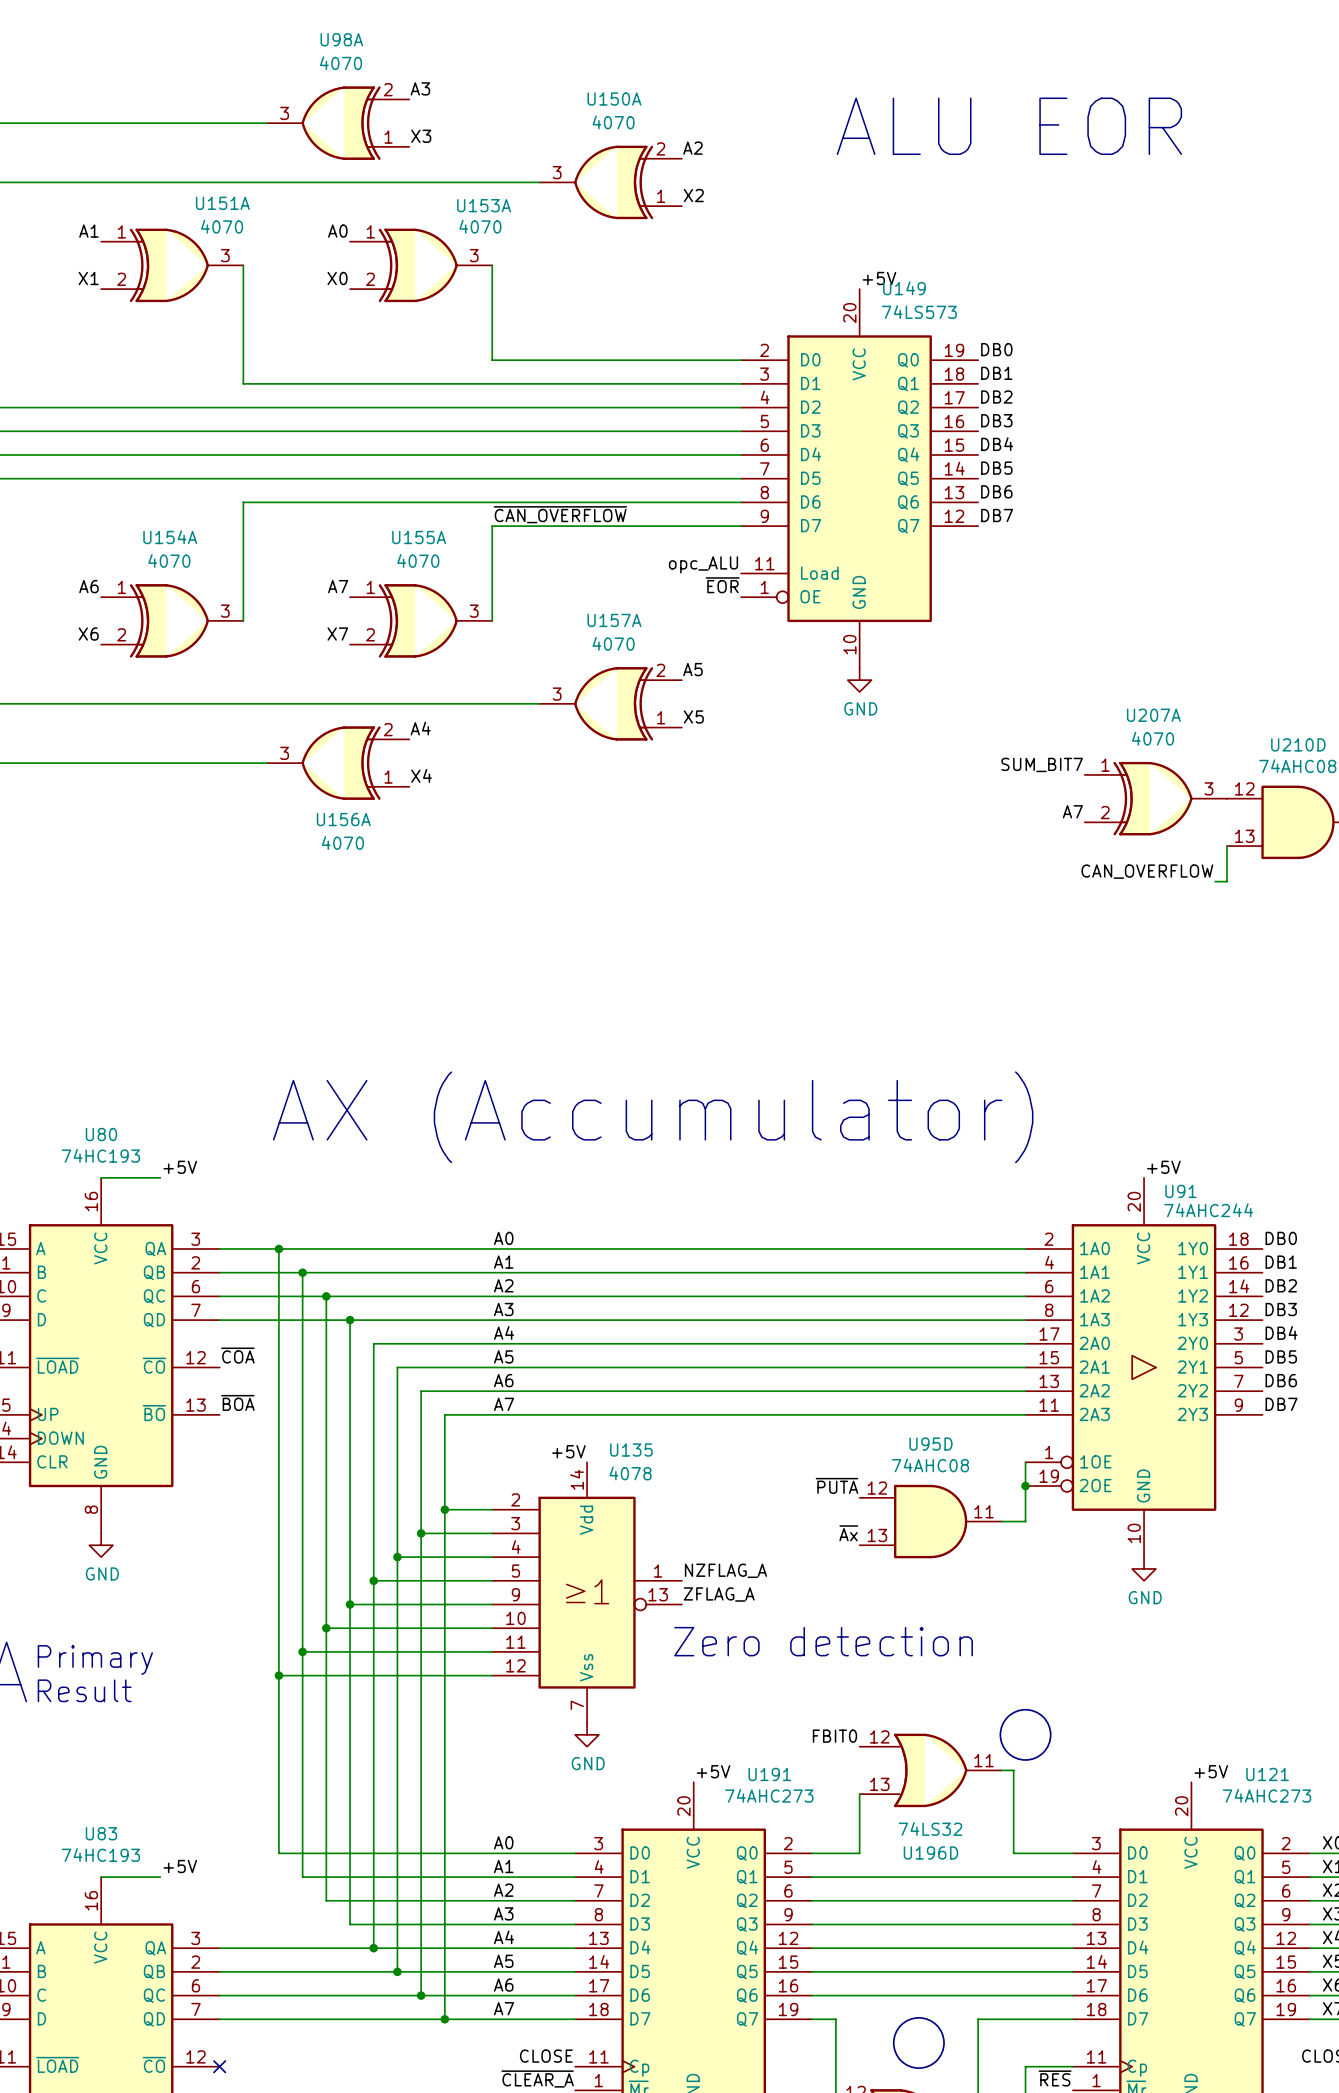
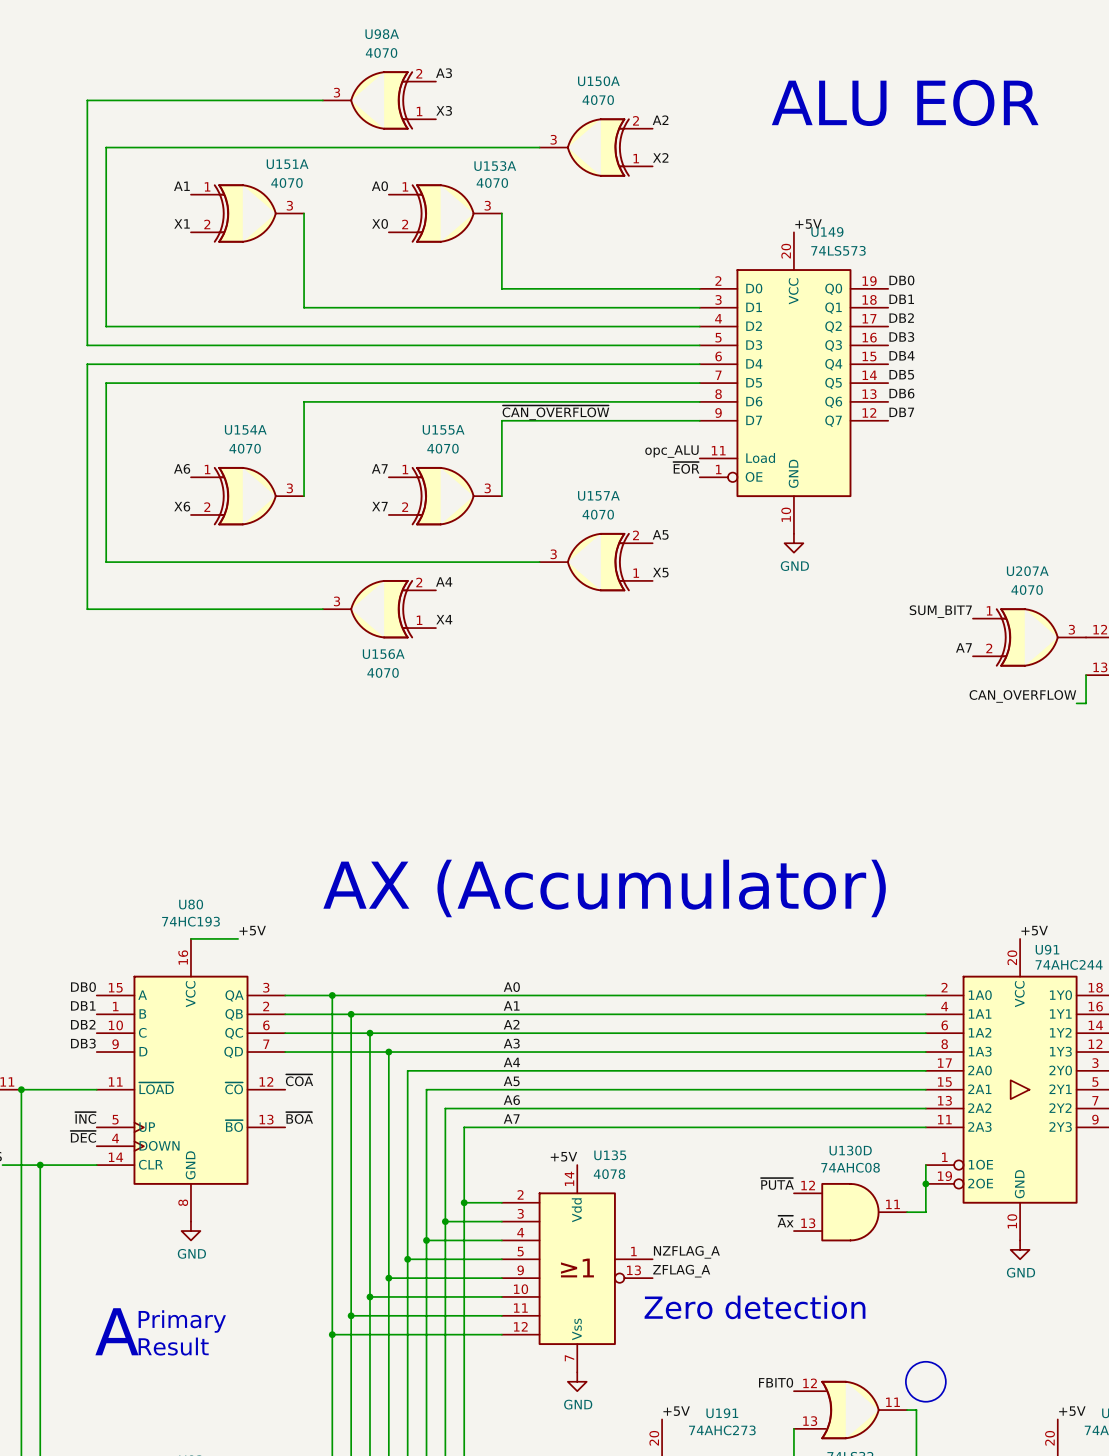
U95D name: U95D (931, 1444) -> U130D (850, 1150)

